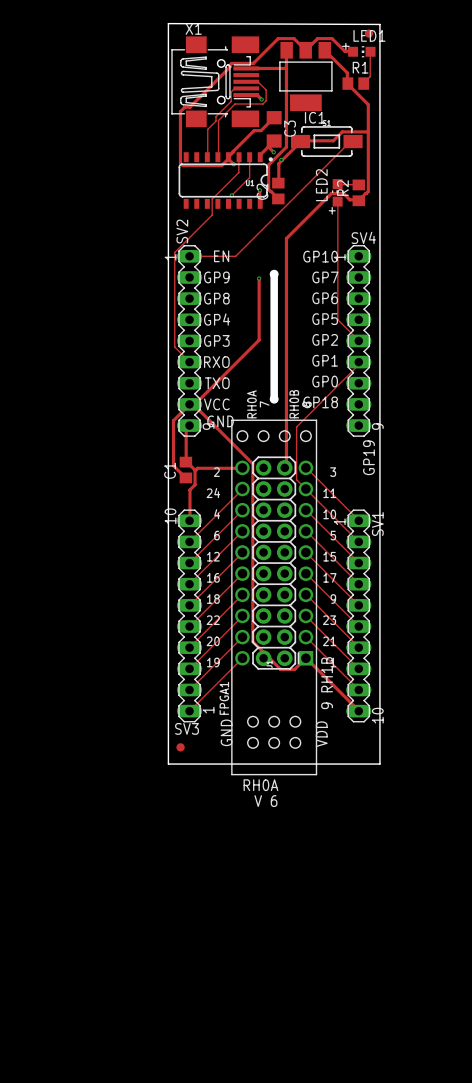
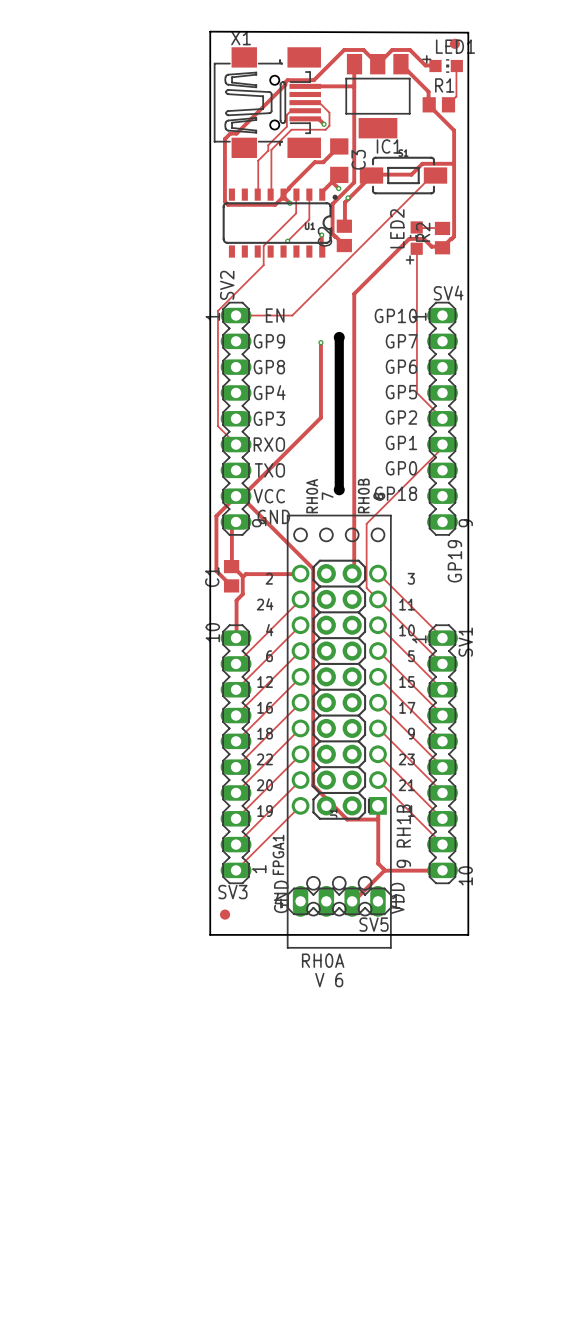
track: none -> (377, 805) (378, 863) (384, 870)
track: (294, 669) (306, 658) (358, 711) -> (384, 870) (442, 870)
track: none -> (364, 819) (378, 819)
track: none -> (384, 870) (352, 901)
SV5: none -> (339, 901)

